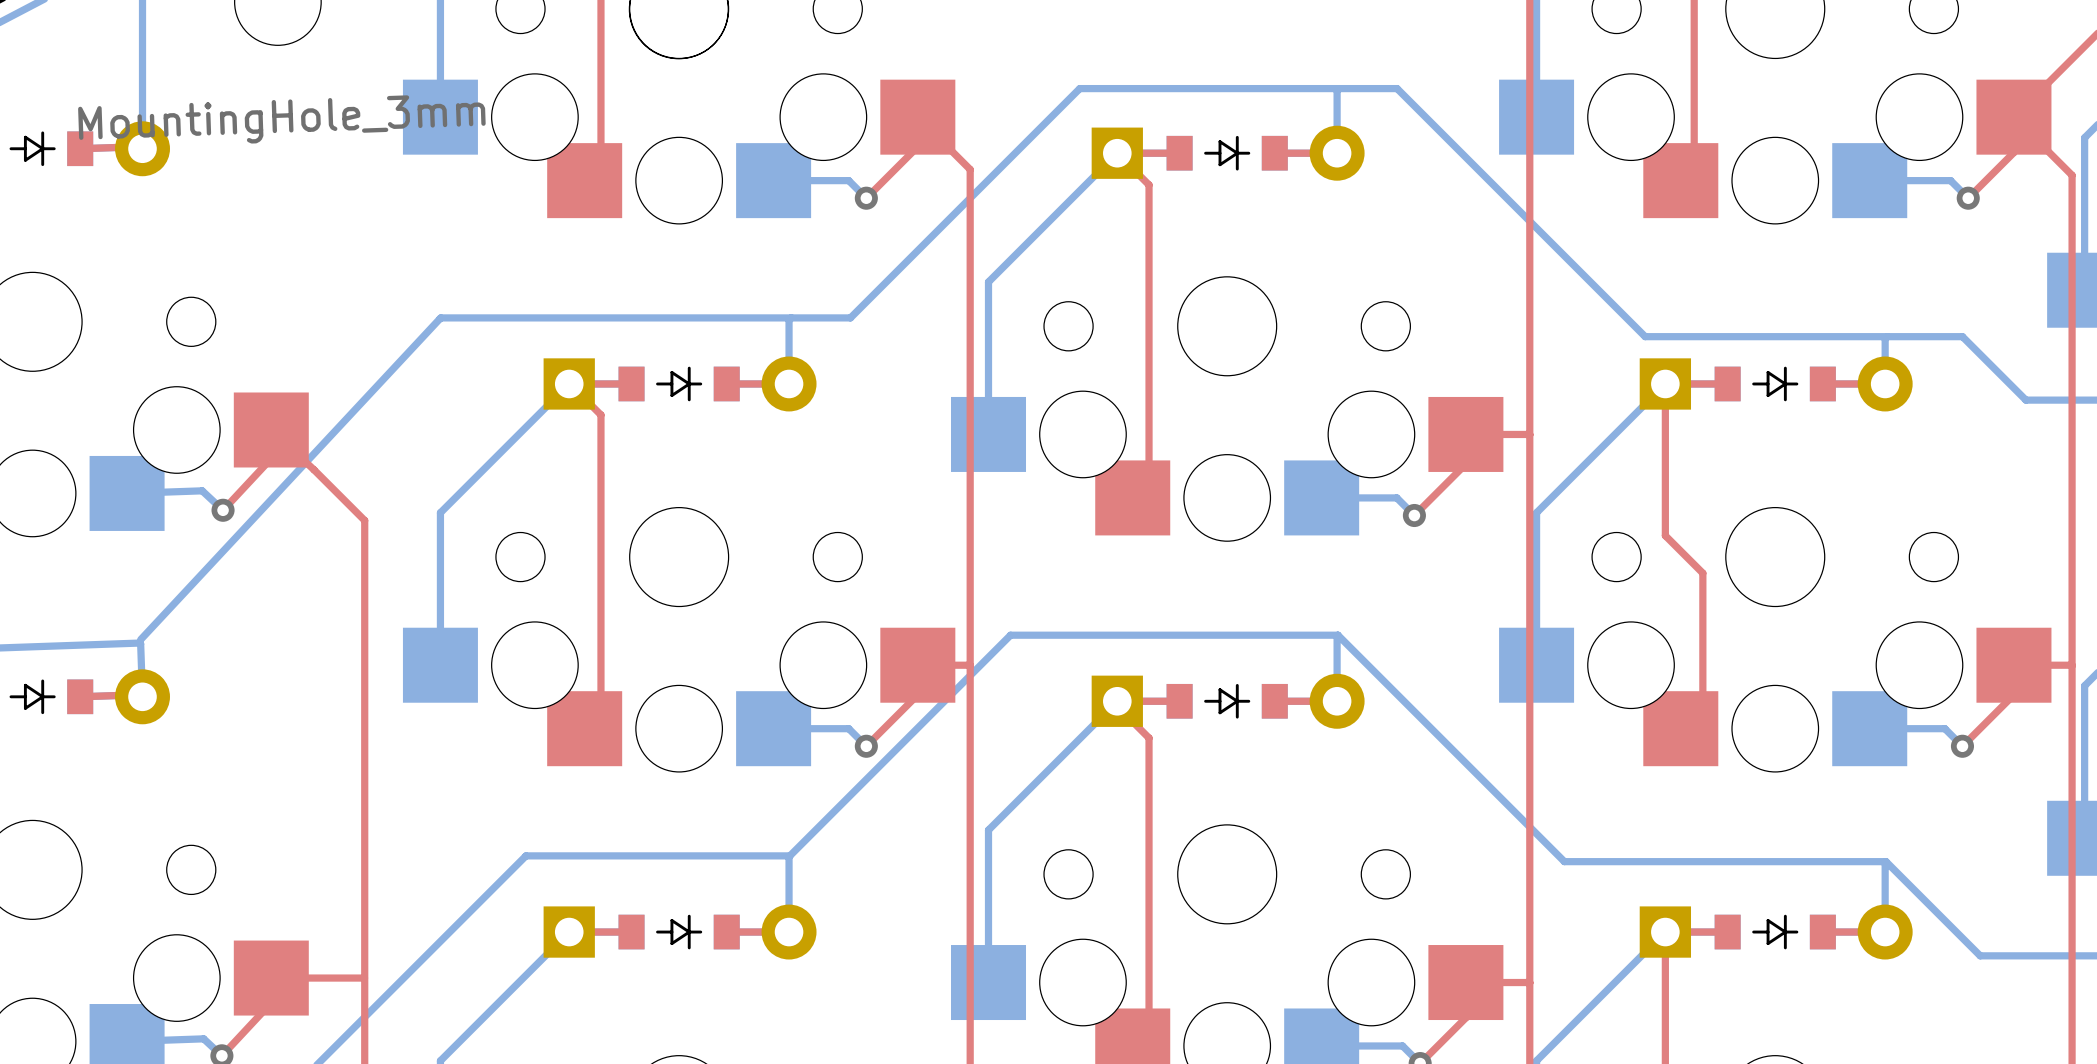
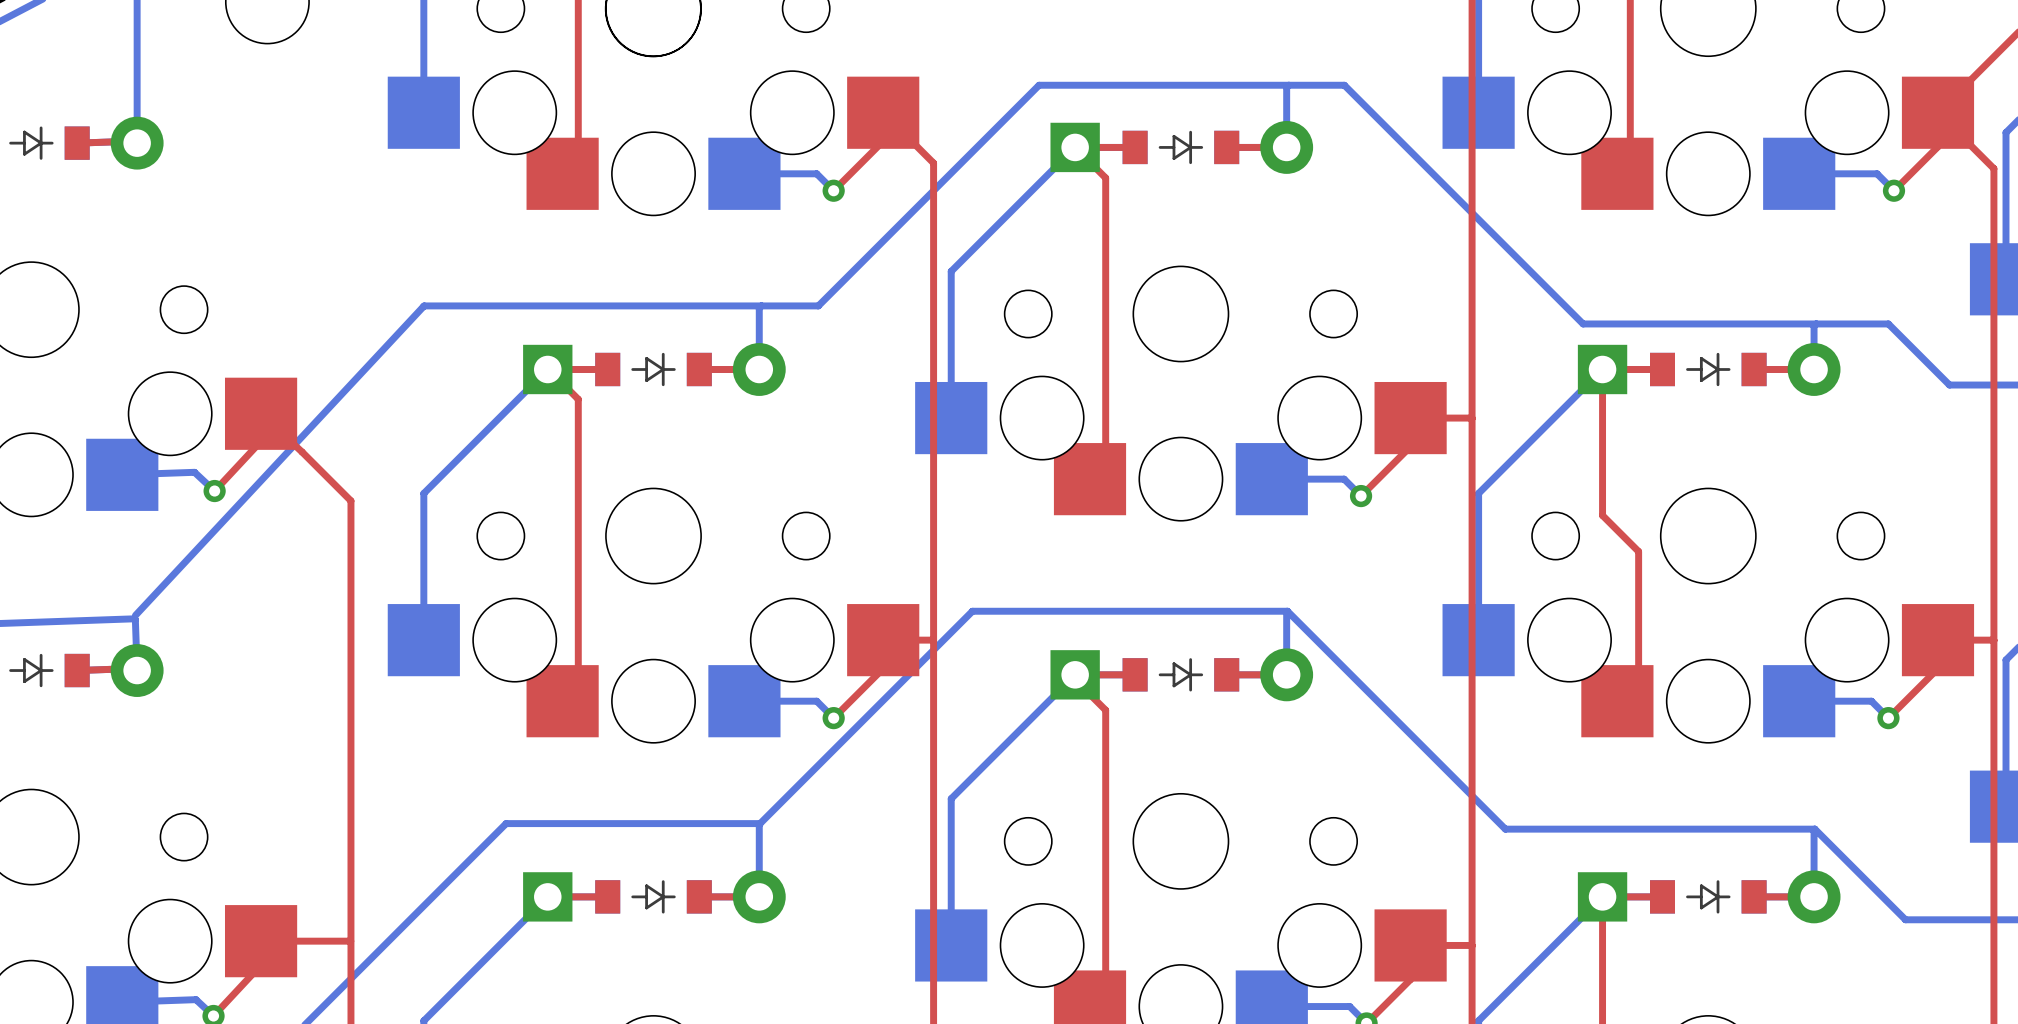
part value: MountingHole_3mm (281, 119) -> none

